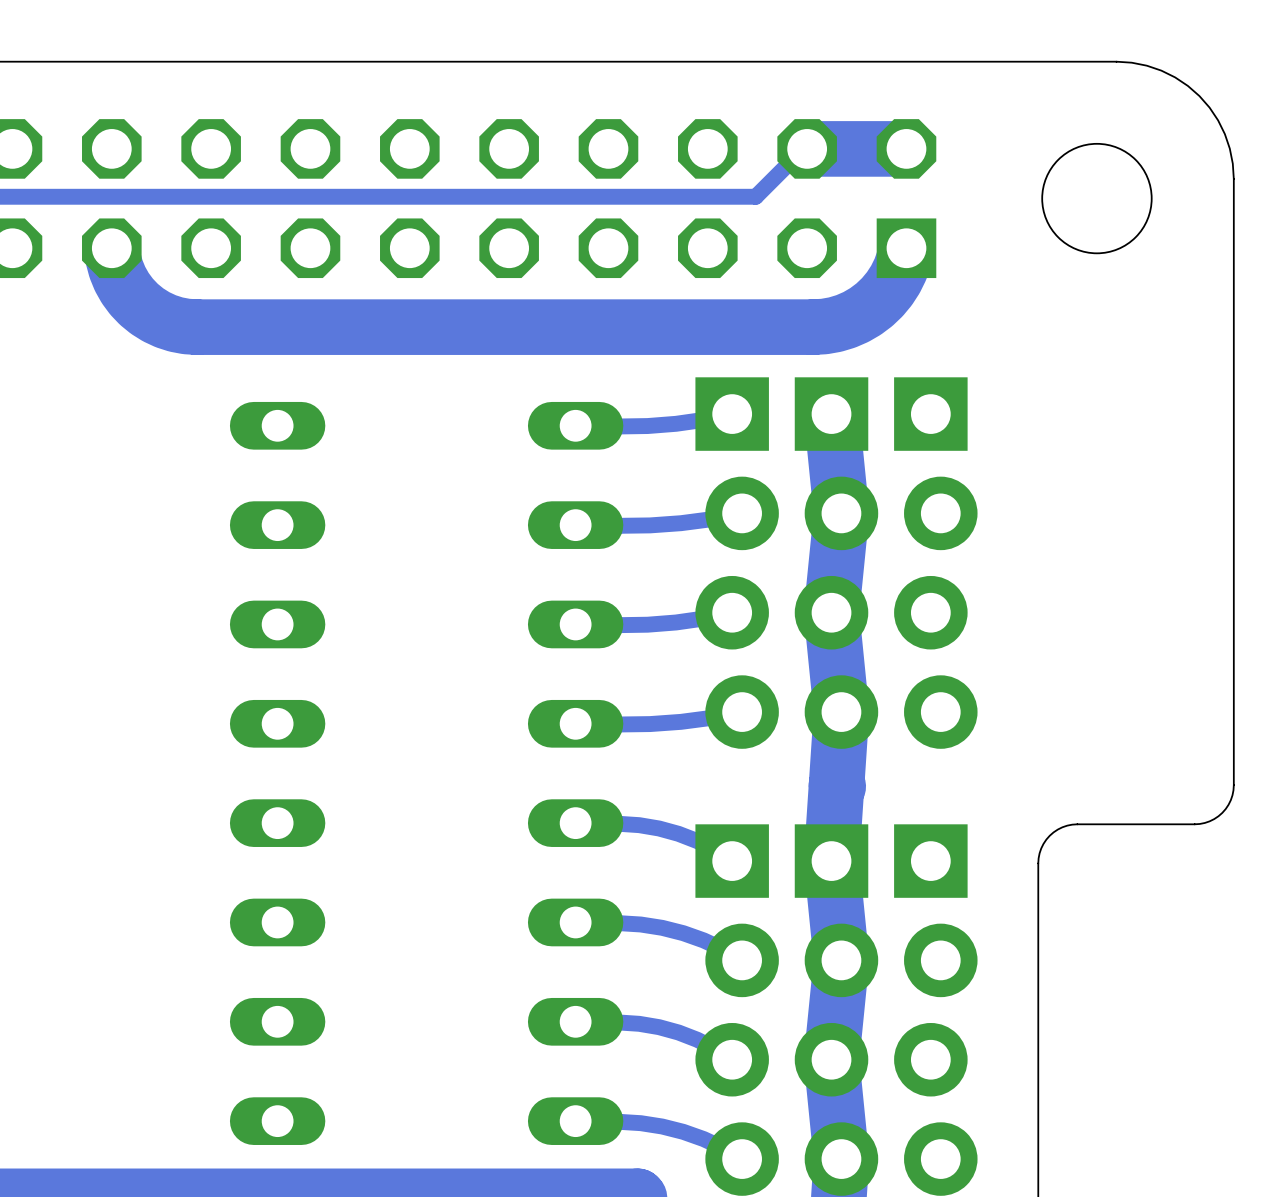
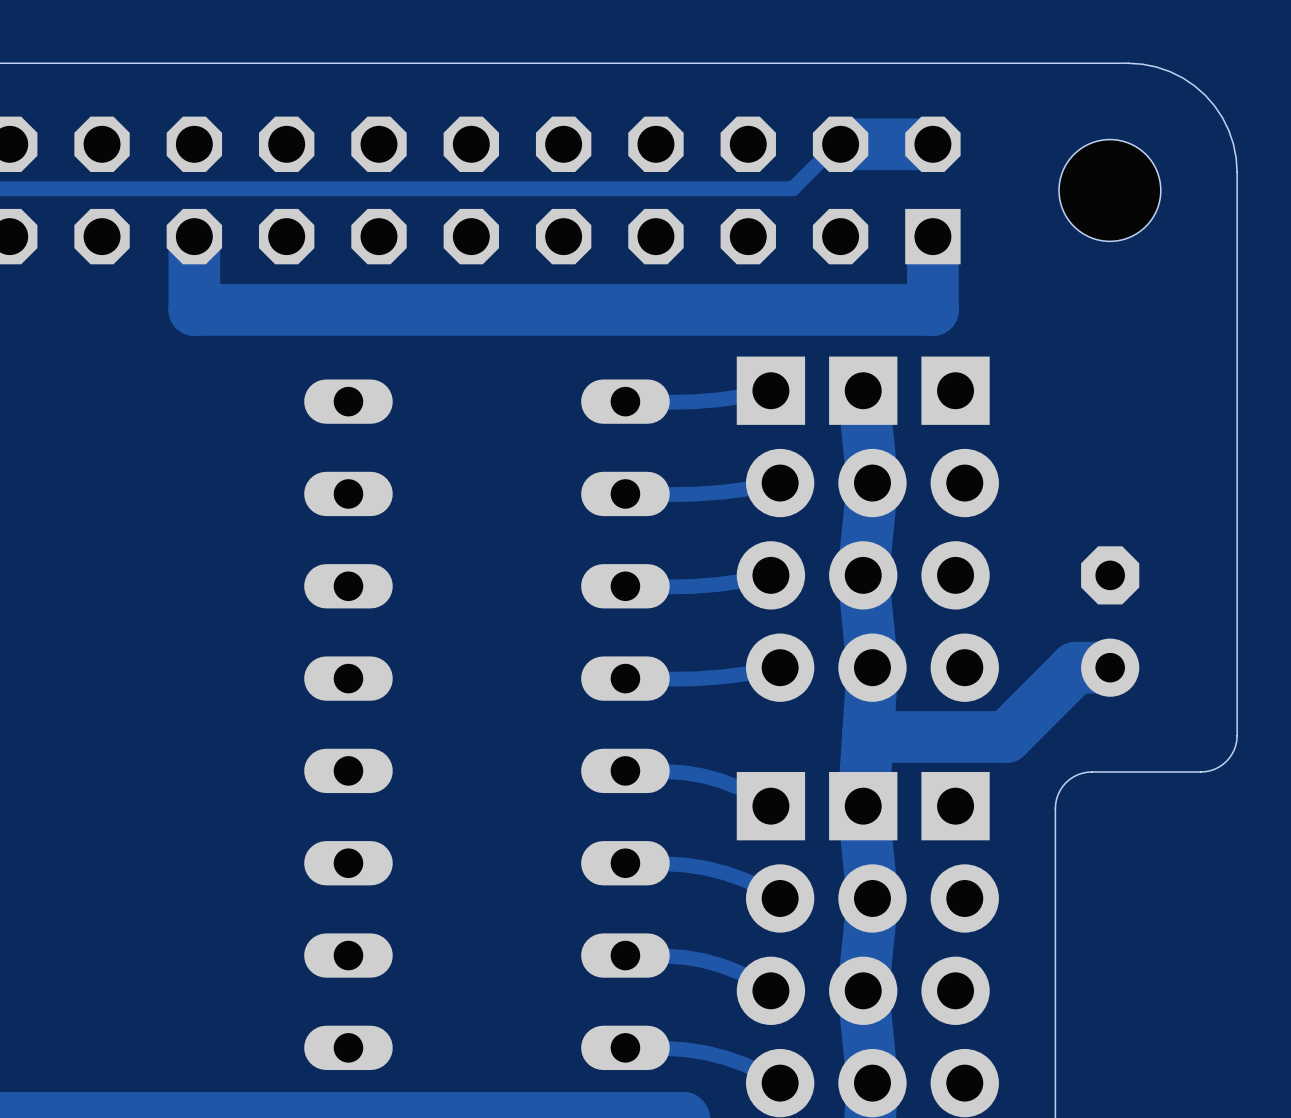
track: (111, 248) (120, 278) (138, 304) (165, 321) (197, 327) -> (194, 236) (194, 309) (273, 309)
track: (906, 248) (895, 279) (874, 304) (845, 321) (813, 327) -> (932, 236) (932, 309) (846, 309)
part: none -> (1110, 621)
track: none -> (1110, 667) (1075, 667) (1006, 736) (869, 736)

